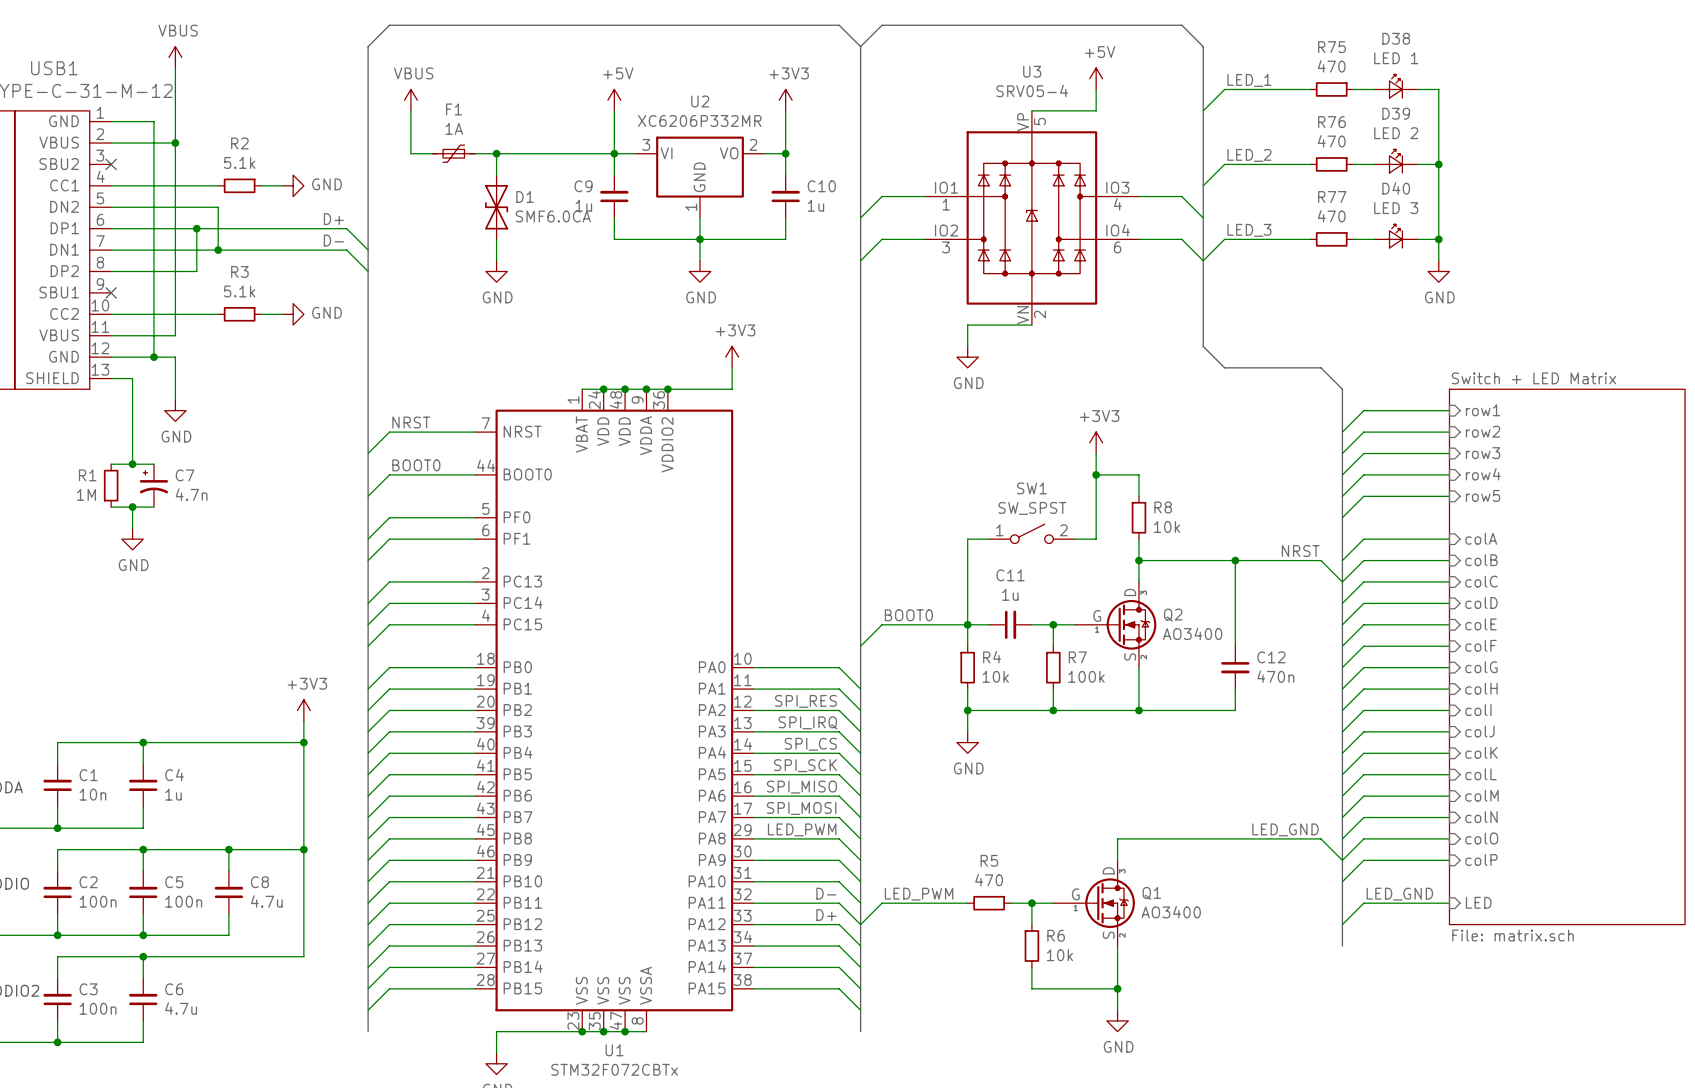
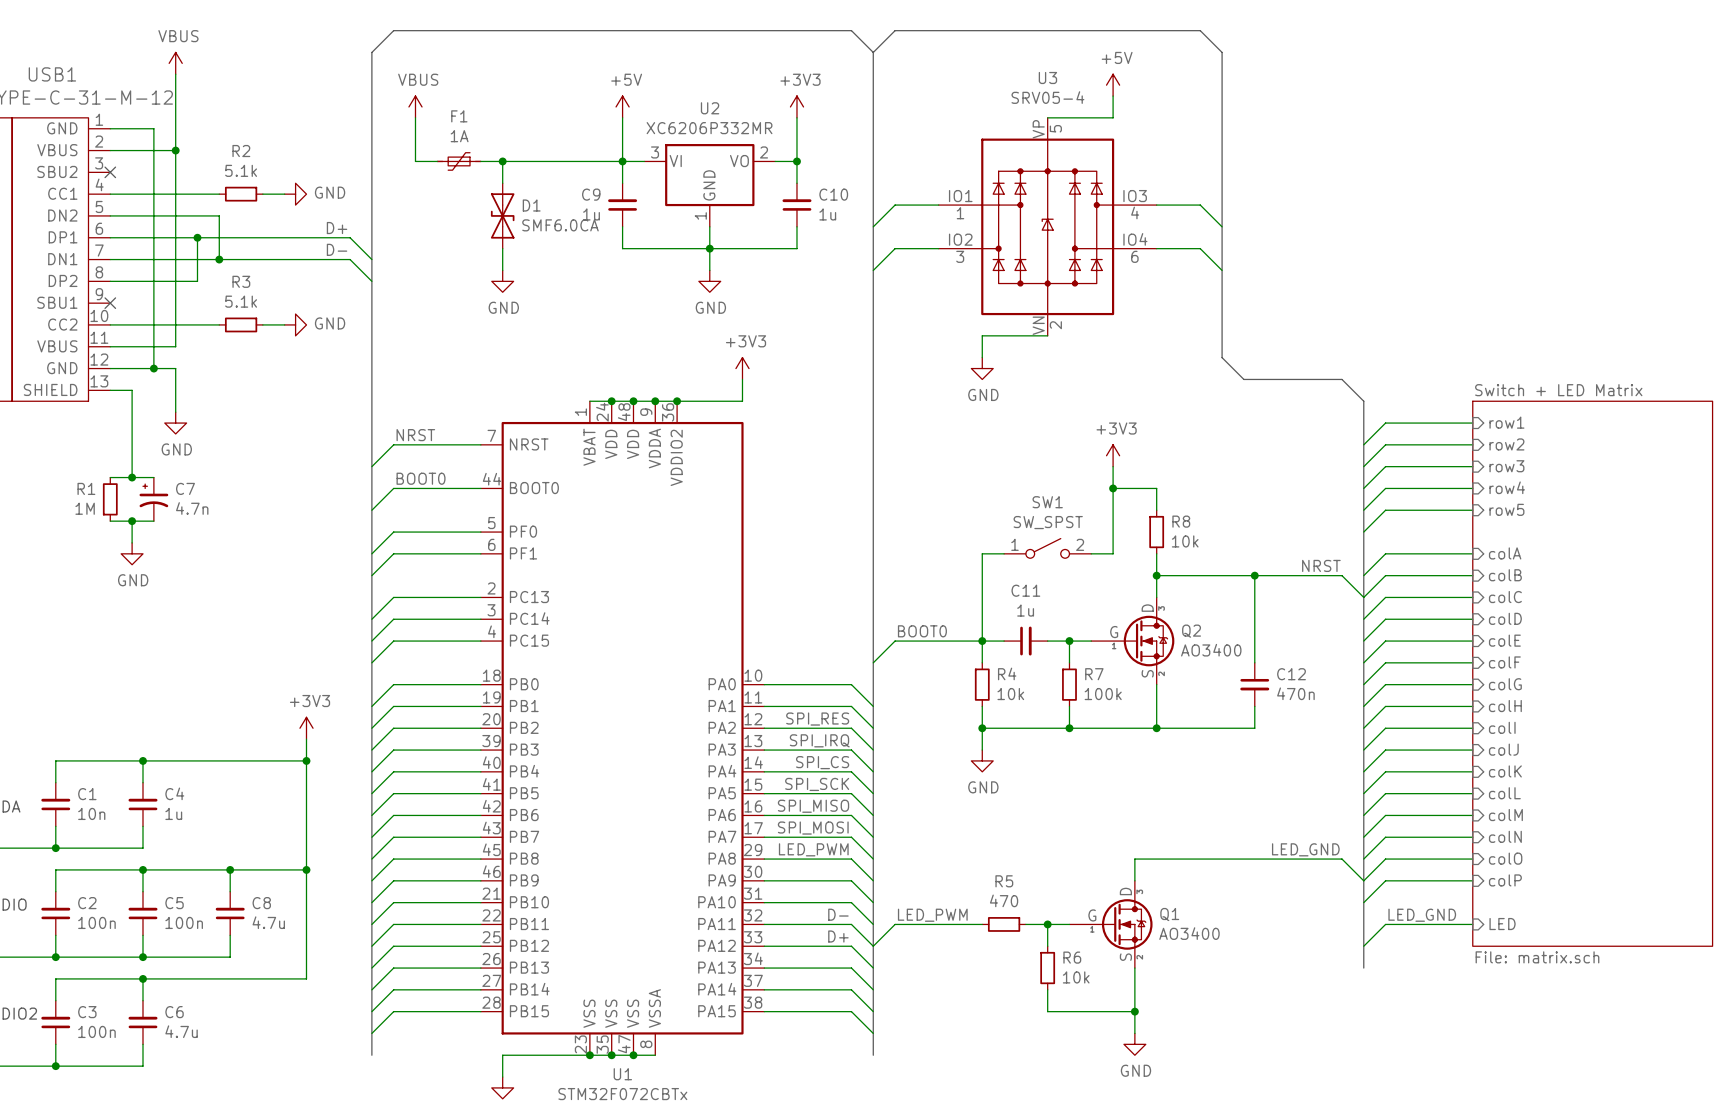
label: LED_1 (1249, 80) -> none
D38: LED 1 (1395, 86) -> none
wire: (1310, 89) (1224, 89) (1203, 110) -> none
R75: 470 (1331, 89) -> none
wire: (1353, 89) (1374, 89) -> none
wire: (1417, 89) (1438, 89) (1438, 260) -> none
label: LED_2 (1249, 155) -> none
D39: LED 2 (1395, 161) -> none
wire: (1310, 164) (1224, 164) (1203, 185) -> none
R76: 470 (1331, 164) -> none
wire: (1353, 164) (1374, 164) -> none
wire: (1417, 164) (1438, 164) -> none
junction: (1438, 164) -> none
label: LED_3 (1249, 230) -> none
D40: LED 3 (1395, 236) -> none
wire: (1310, 239) (1224, 239) (1203, 260) -> none
R77: 470 (1331, 239) -> none
wire: (1353, 239) (1374, 239) -> none
wire: (1417, 239) (1438, 239) -> none
junction: (1438, 239) -> none
power symbol: GND (1438, 271) -> none

